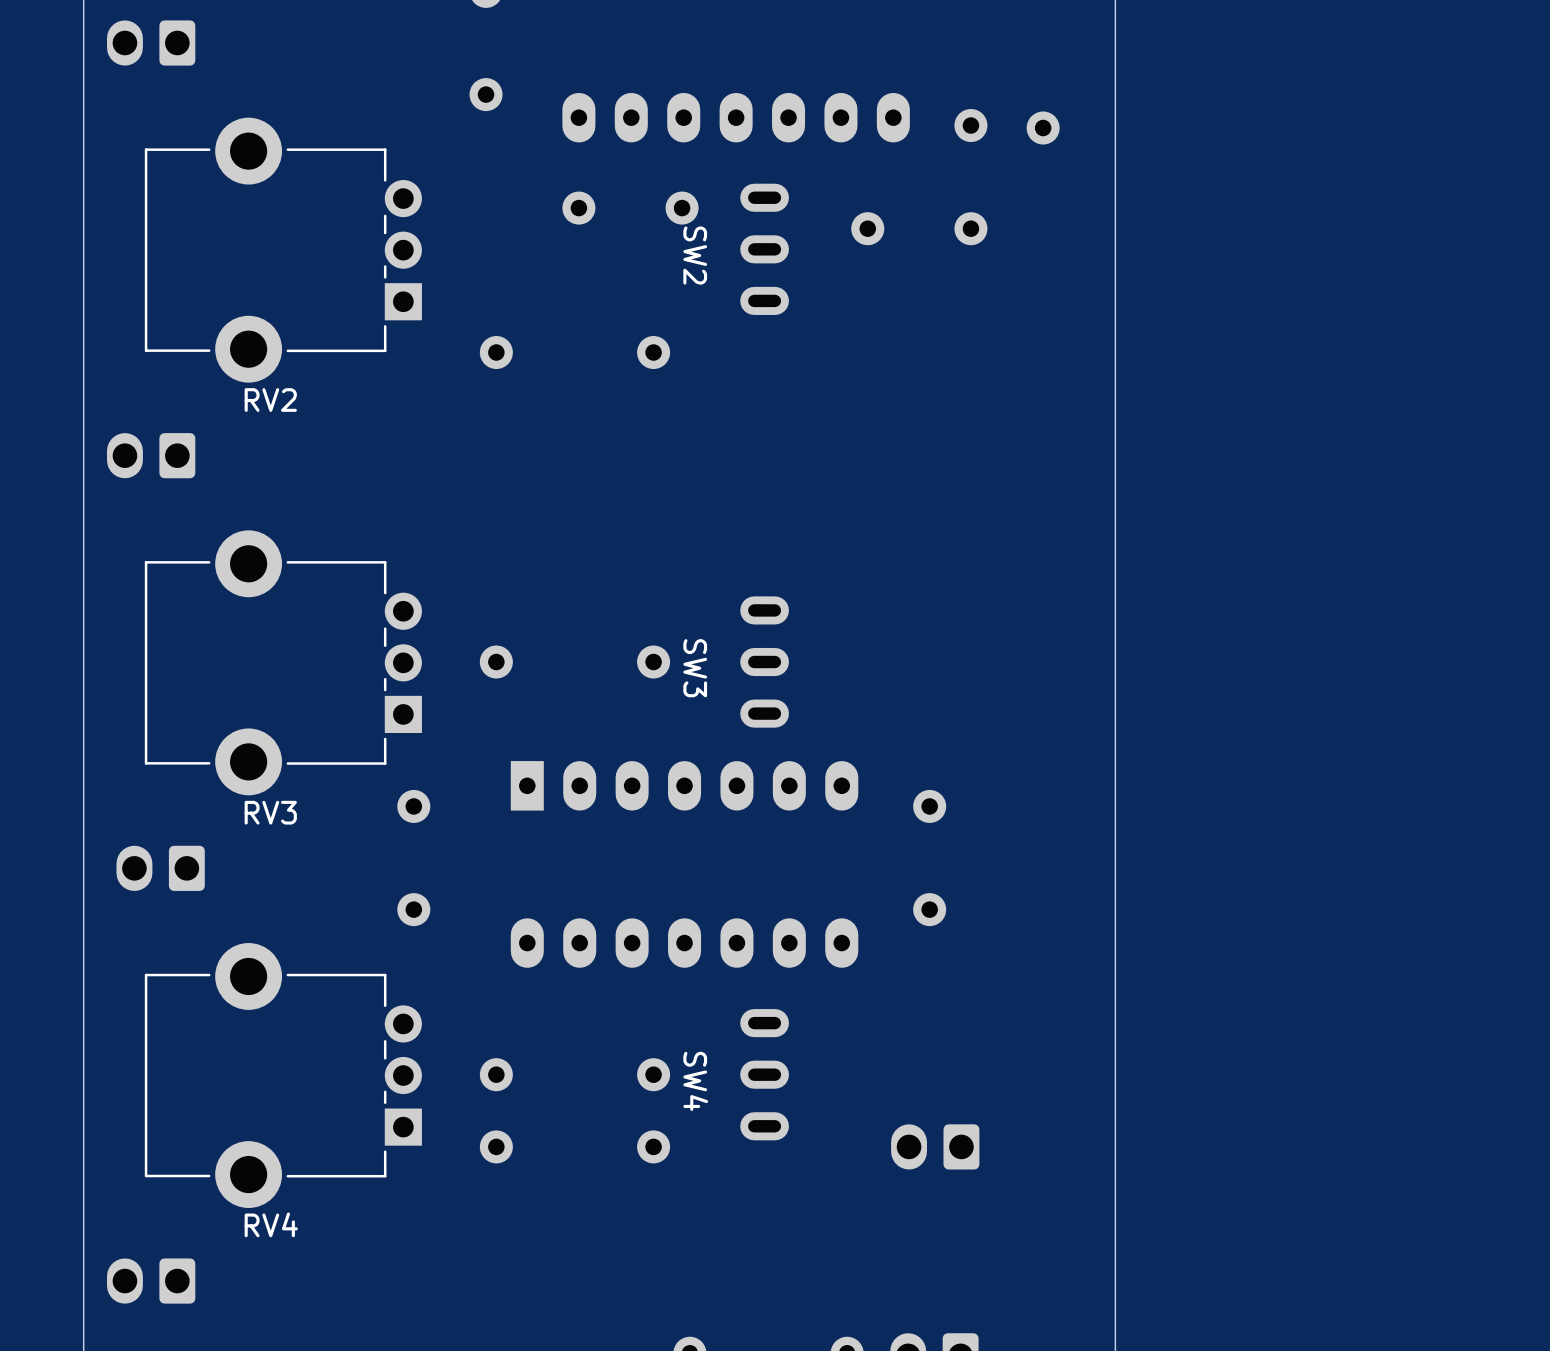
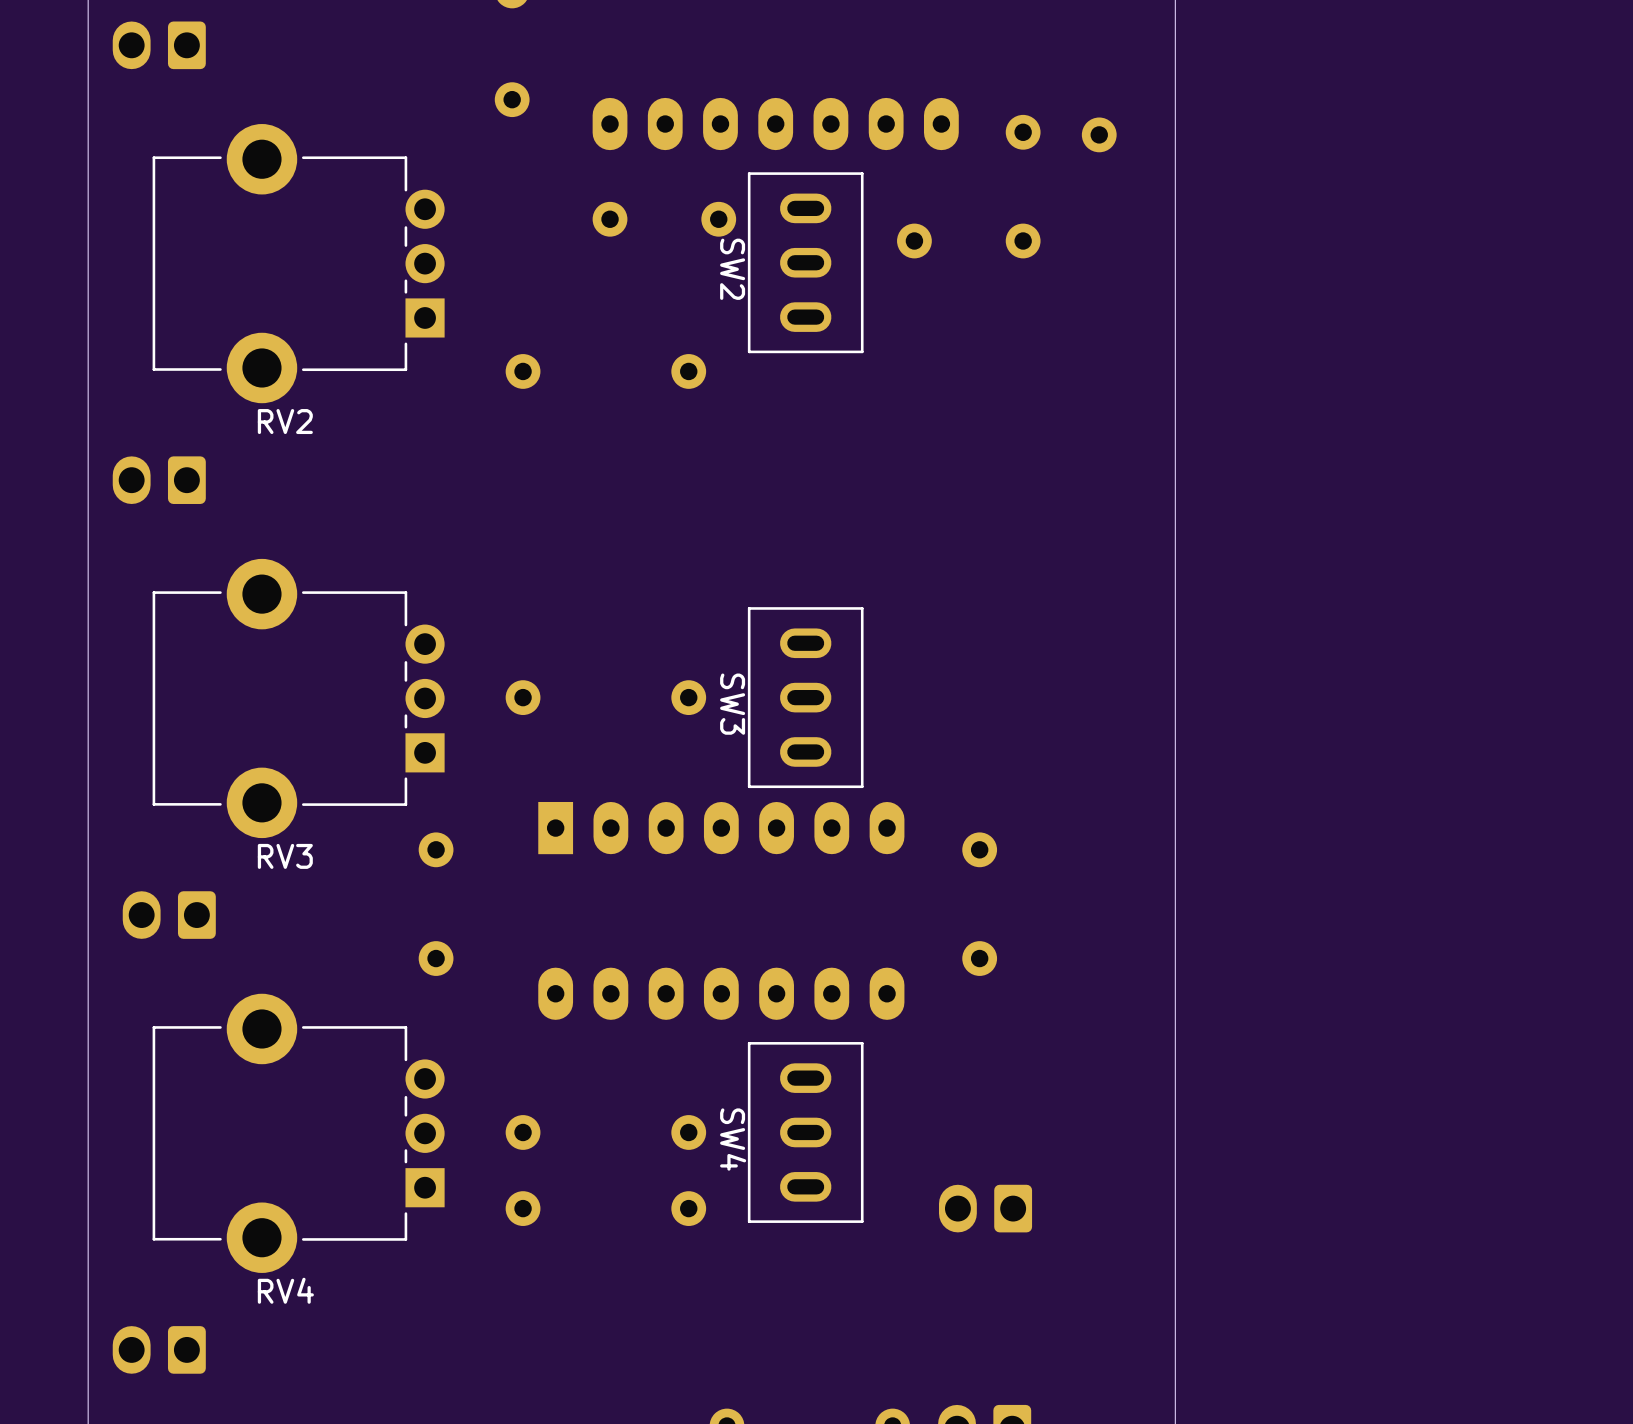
SW2 footprint: [740, 183, 789, 315] -> [747, 172, 864, 354]
SW3 footprint: [740, 596, 789, 728] -> [747, 607, 864, 789]
SW4 footprint: [740, 1009, 789, 1141] -> [747, 1042, 864, 1223]

